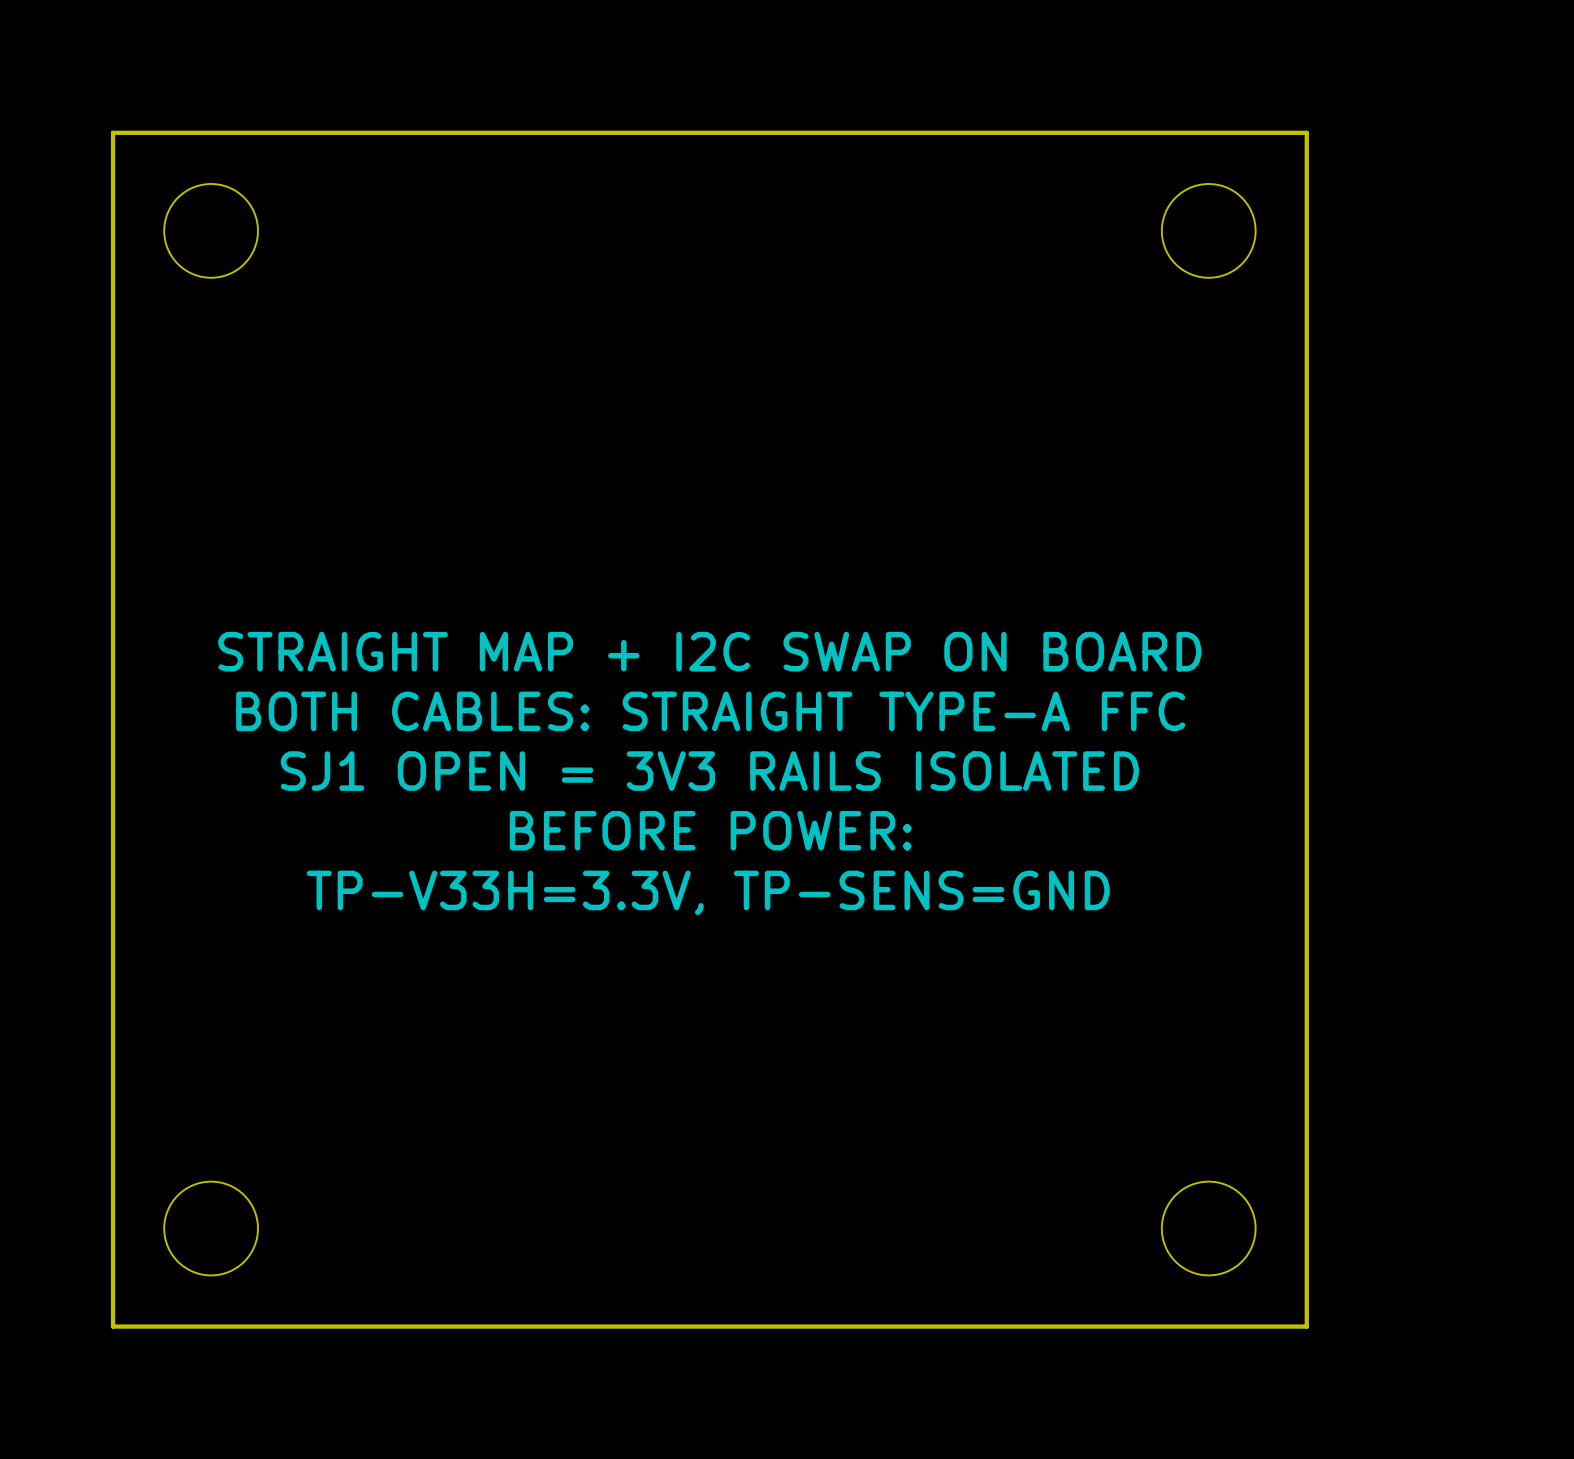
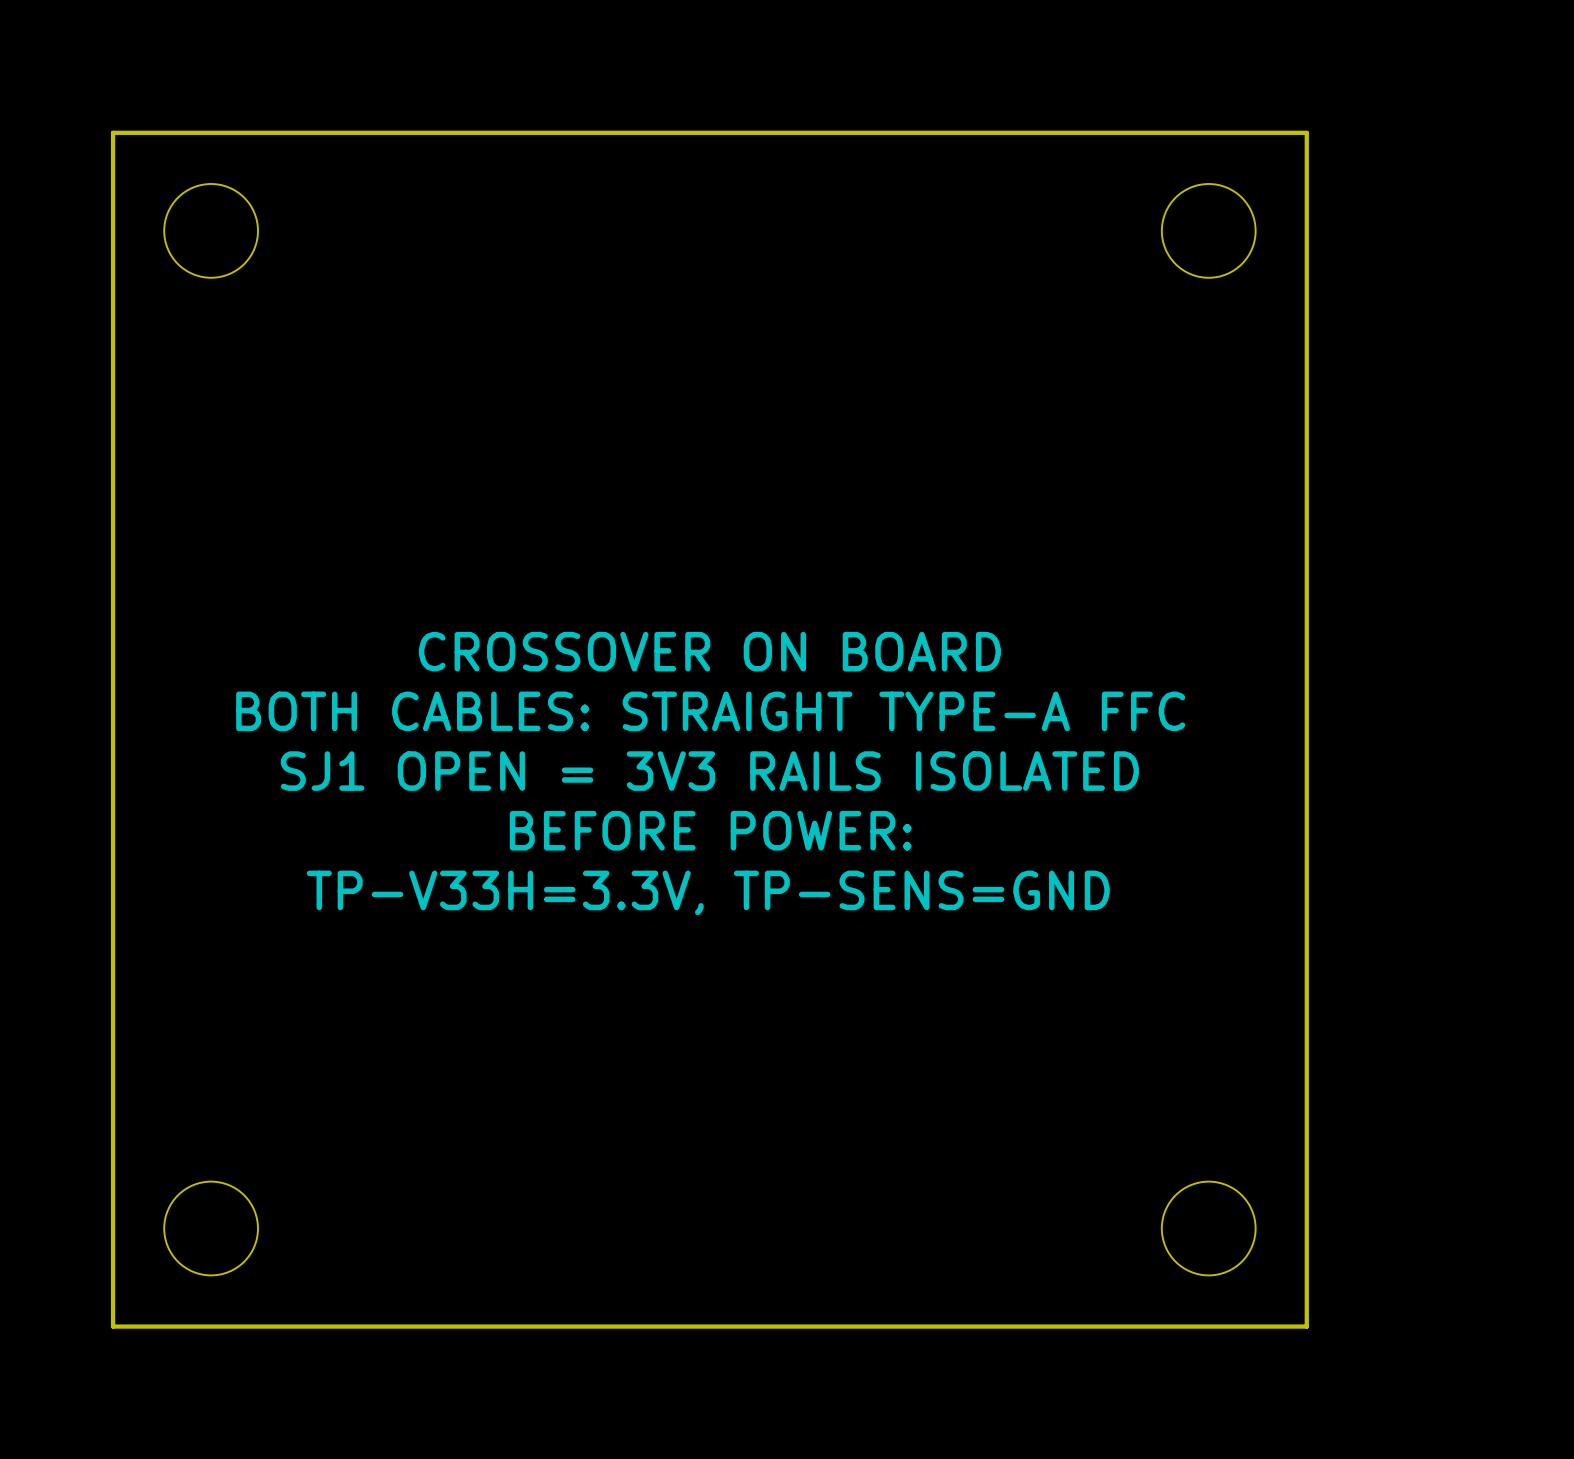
text: STRAIGHT MAP + I2C SWAP ON BOARD (709, 651) -> CROSSOVER ON BOARD (709, 651)

